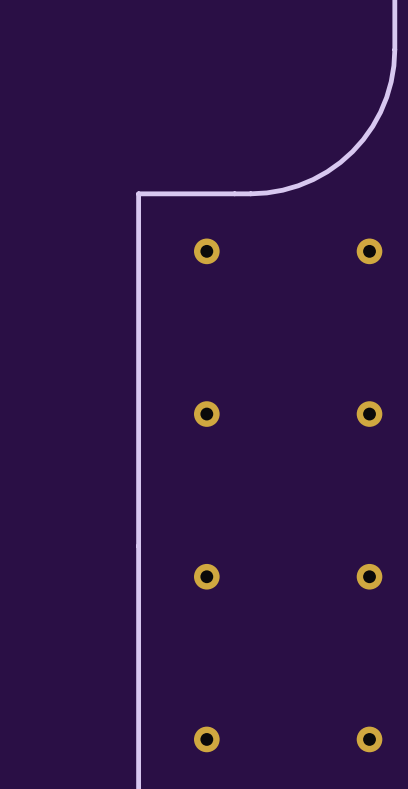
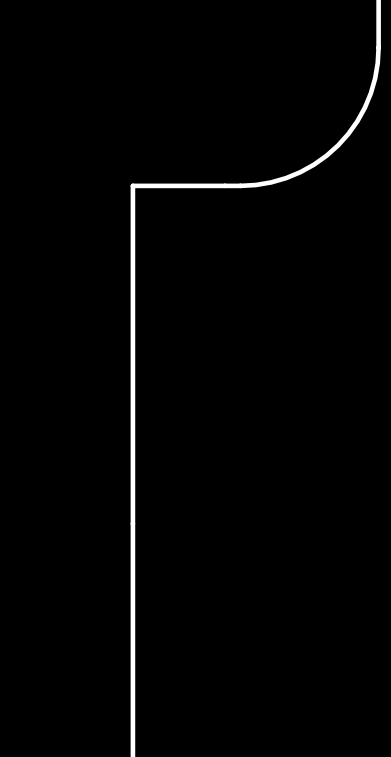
via: (206, 251) -> none
via: (369, 251) -> none
via: (206, 414) -> none
via: (369, 414) -> none
via: (206, 576) -> none
via: (369, 576) -> none
via: (206, 739) -> none
via: (369, 739) -> none

